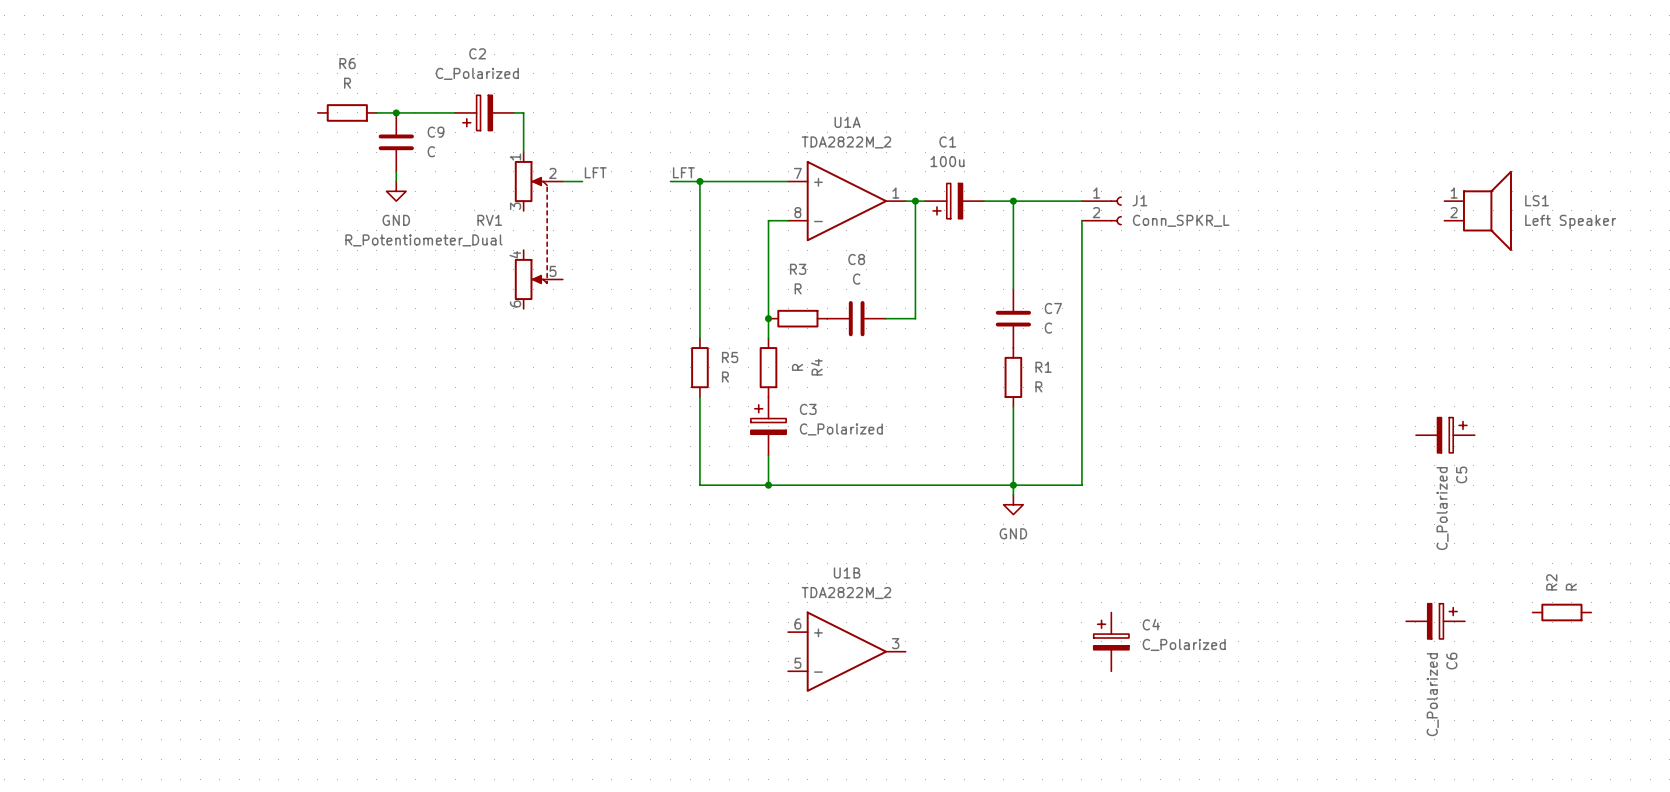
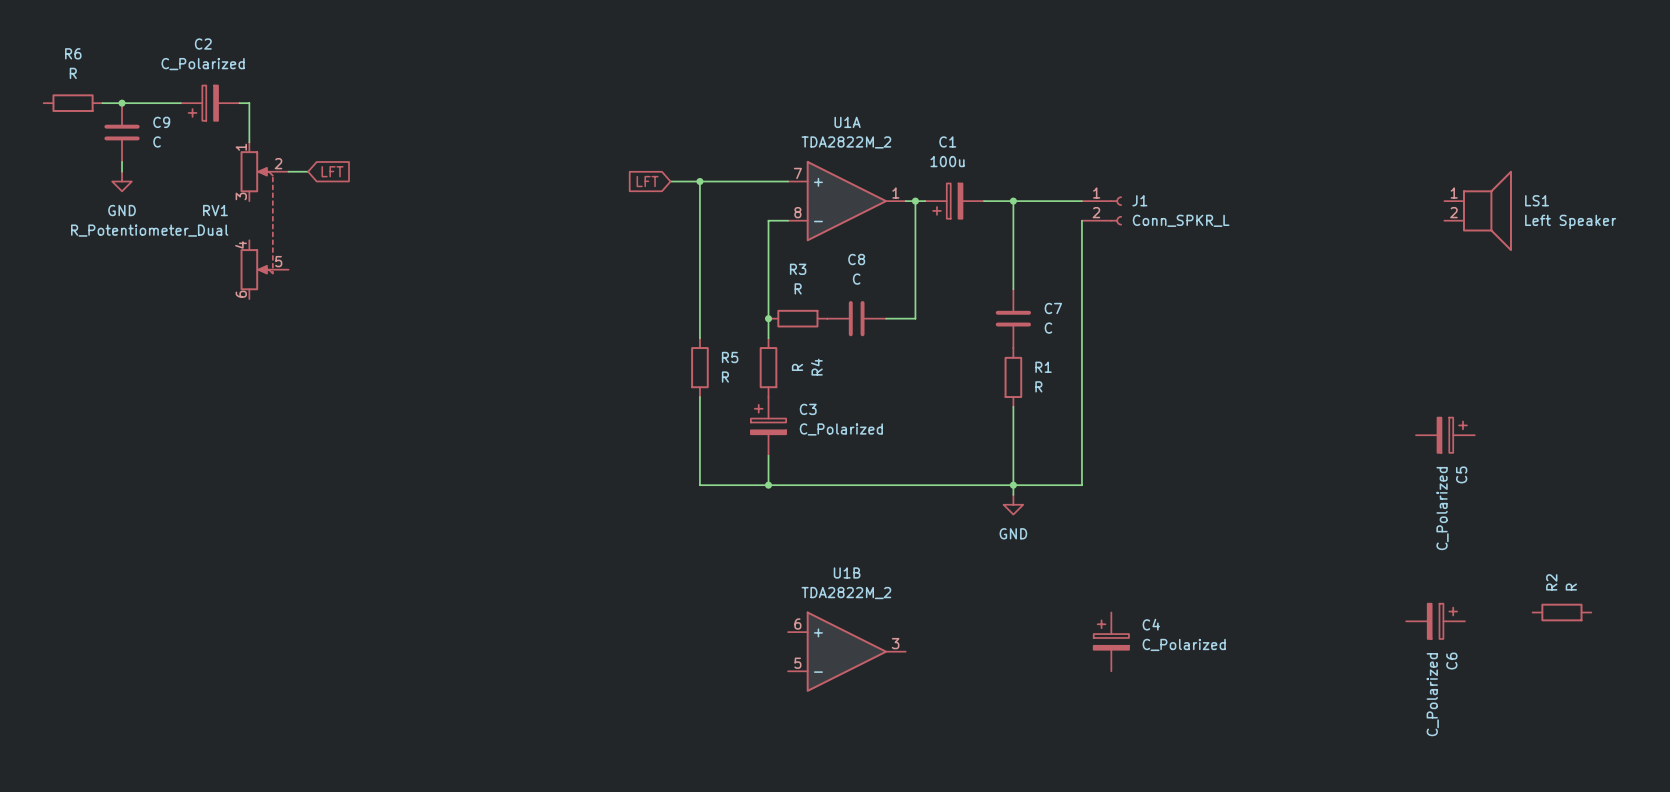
wire: none -> (102, 103) (180, 103)
junction: none -> (122, 103)
wire: none -> (239, 103) (249, 103) (249, 142)
R6 position: (347, 112) -> (73, 103)
wire: (376, 112) (455, 112) -> none
junction: (396, 112) -> none
C2 position: (484, 112) -> (210, 103)
wire: (513, 112) (523, 112) (523, 152) -> none
C9 position: (396, 142) -> (122, 132)
wire: none -> (122, 161) (122, 171)
wire: none -> (288, 171) (308, 171)
global label: none -> LFT (332, 171)
wire: (396, 171) (396, 181) -> none
label: LFT (595, 172) -> none
label: LFT (683, 172) -> none
power symbol: none -> GND (122, 181)
wire: (562, 181) (582, 181) -> none
global label: none -> LFT (647, 181)
power symbol: GND (396, 191) -> none
RV1 position: (538, 230) -> (264, 220)

